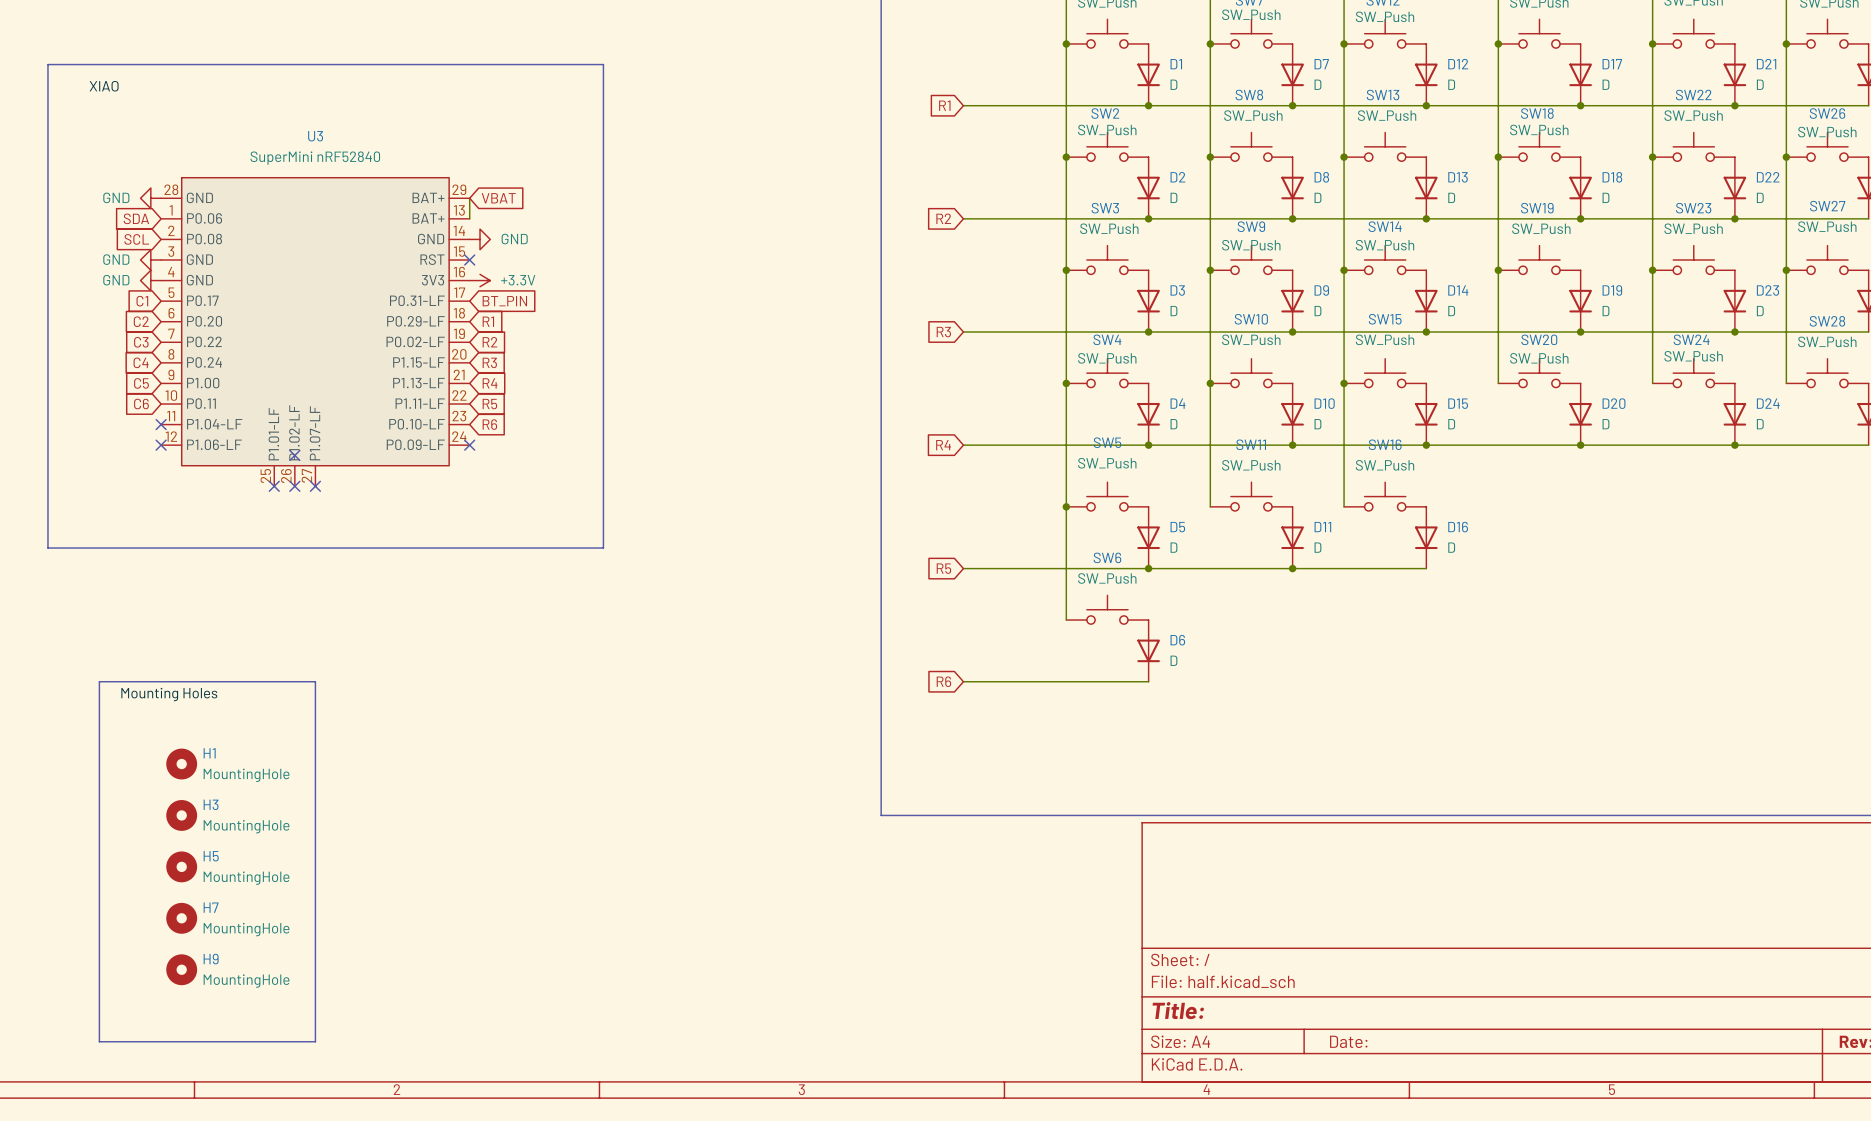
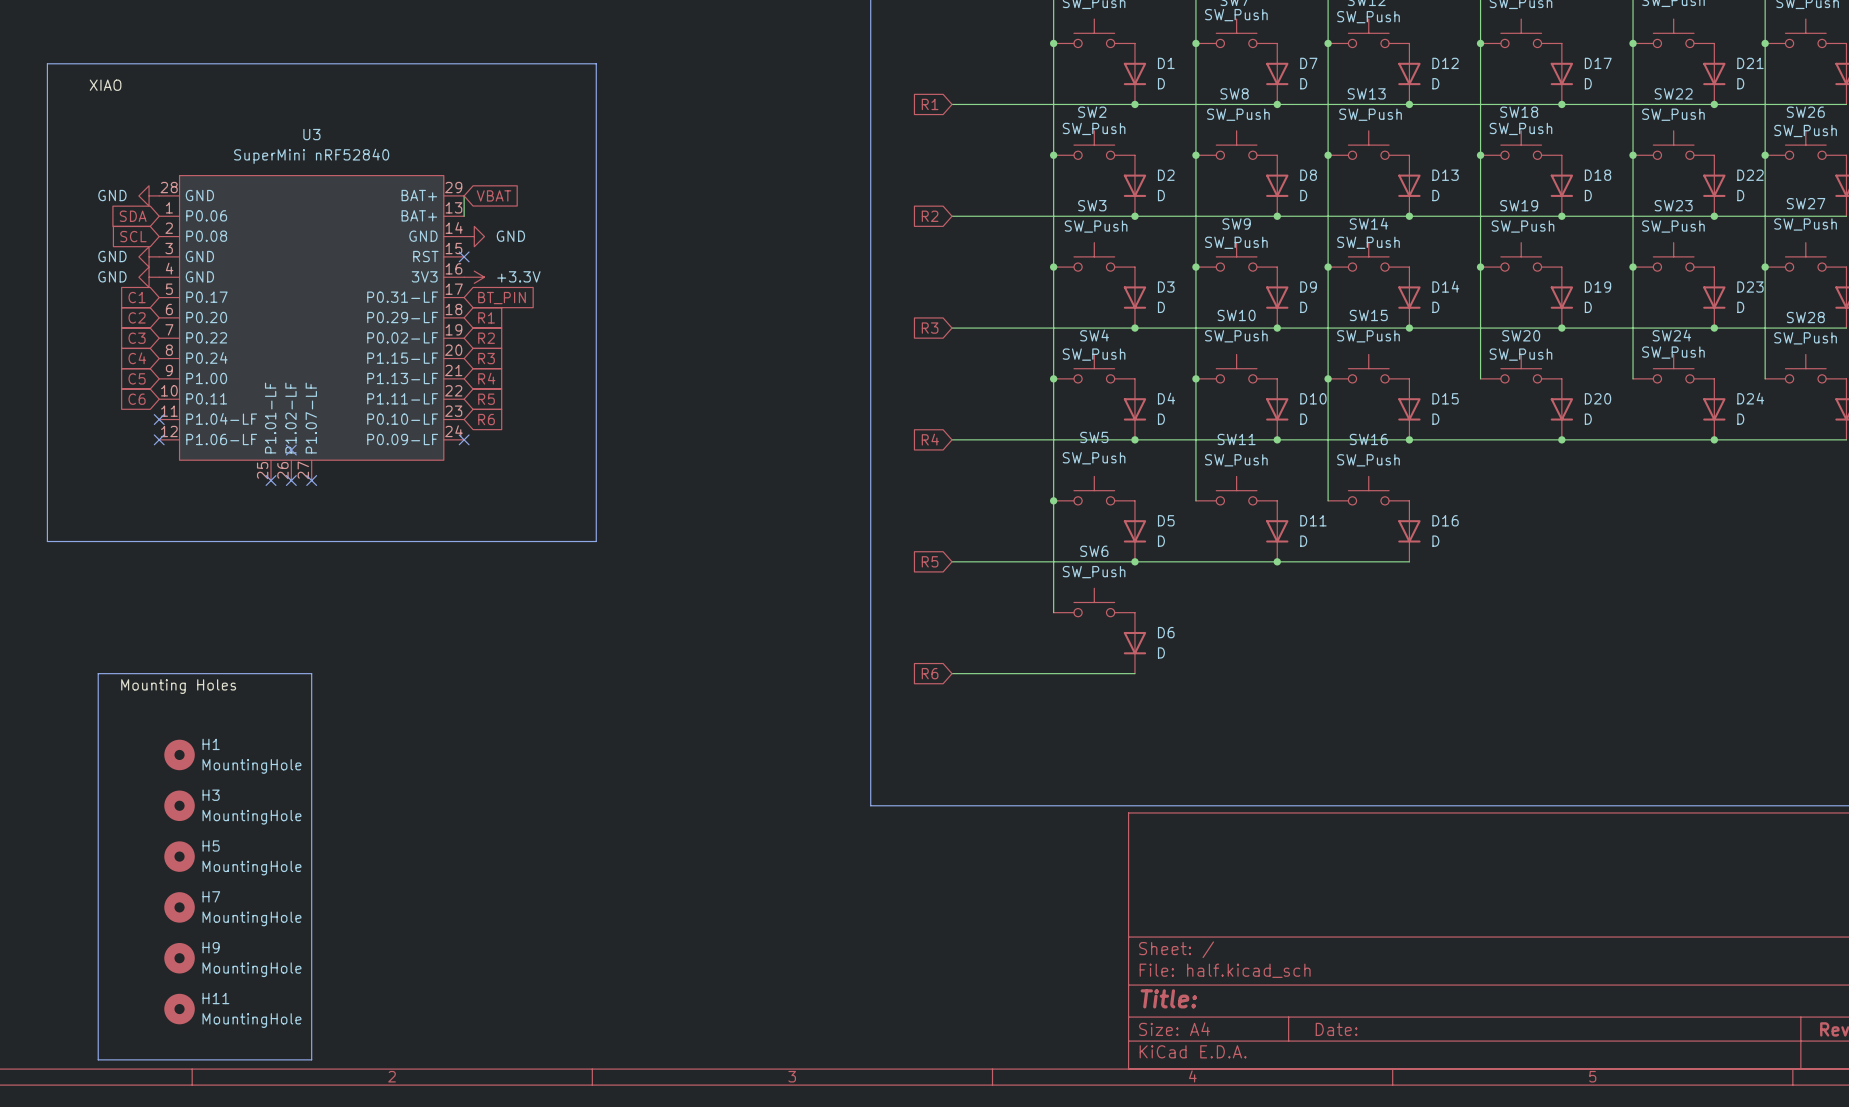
H11: none -> MountingHole (179, 1009)
line: (99, 1041) (315, 1041) -> (98, 1029) (98, 1059) (311, 1059) (311, 1029)

